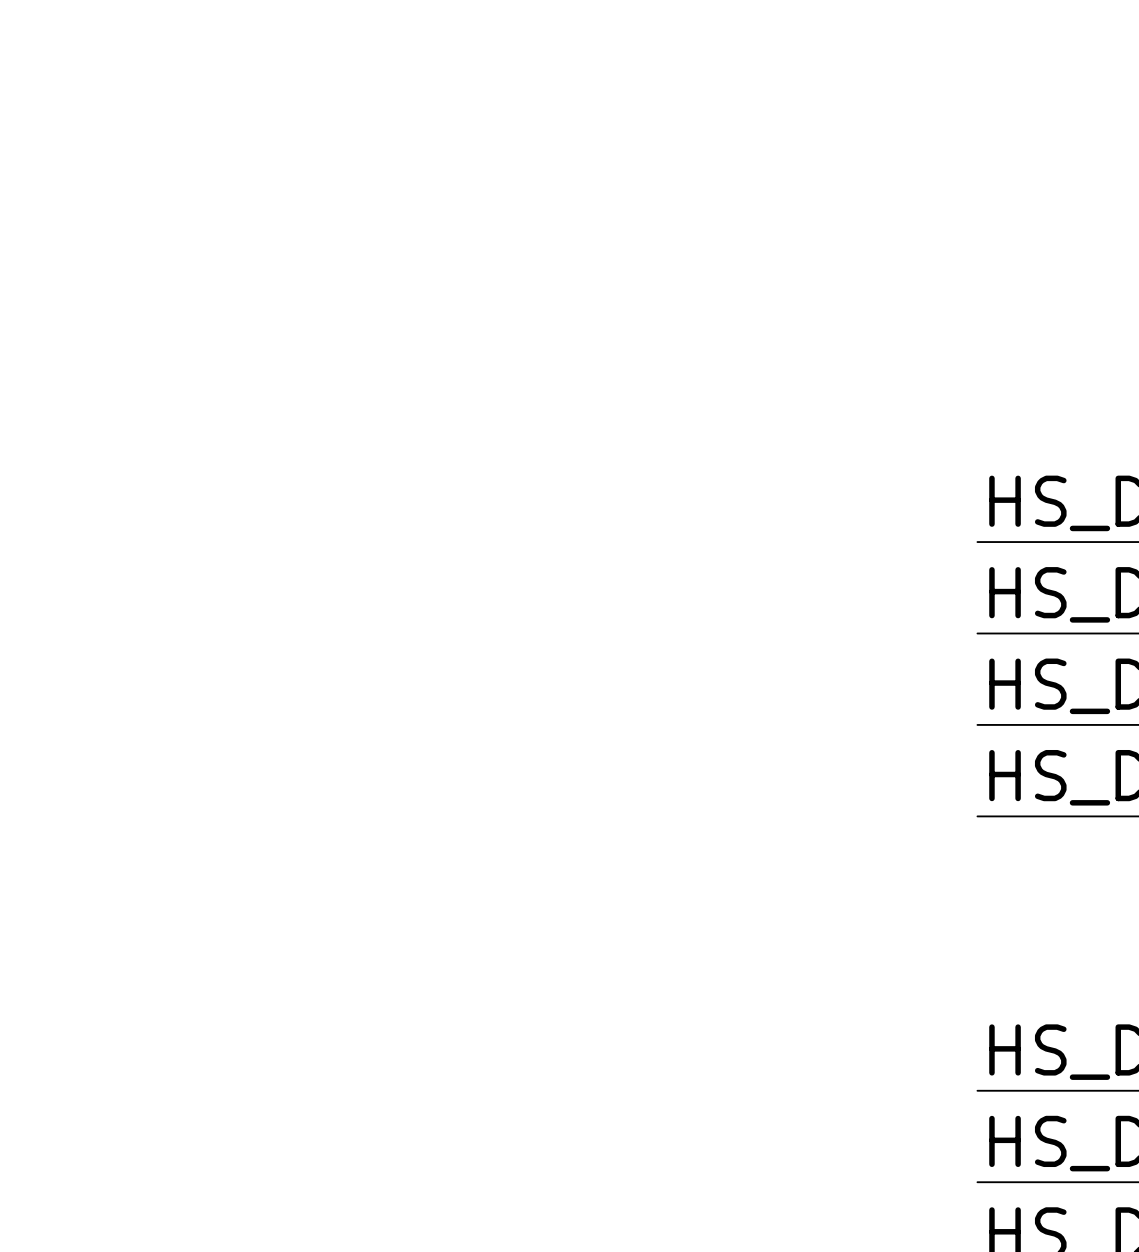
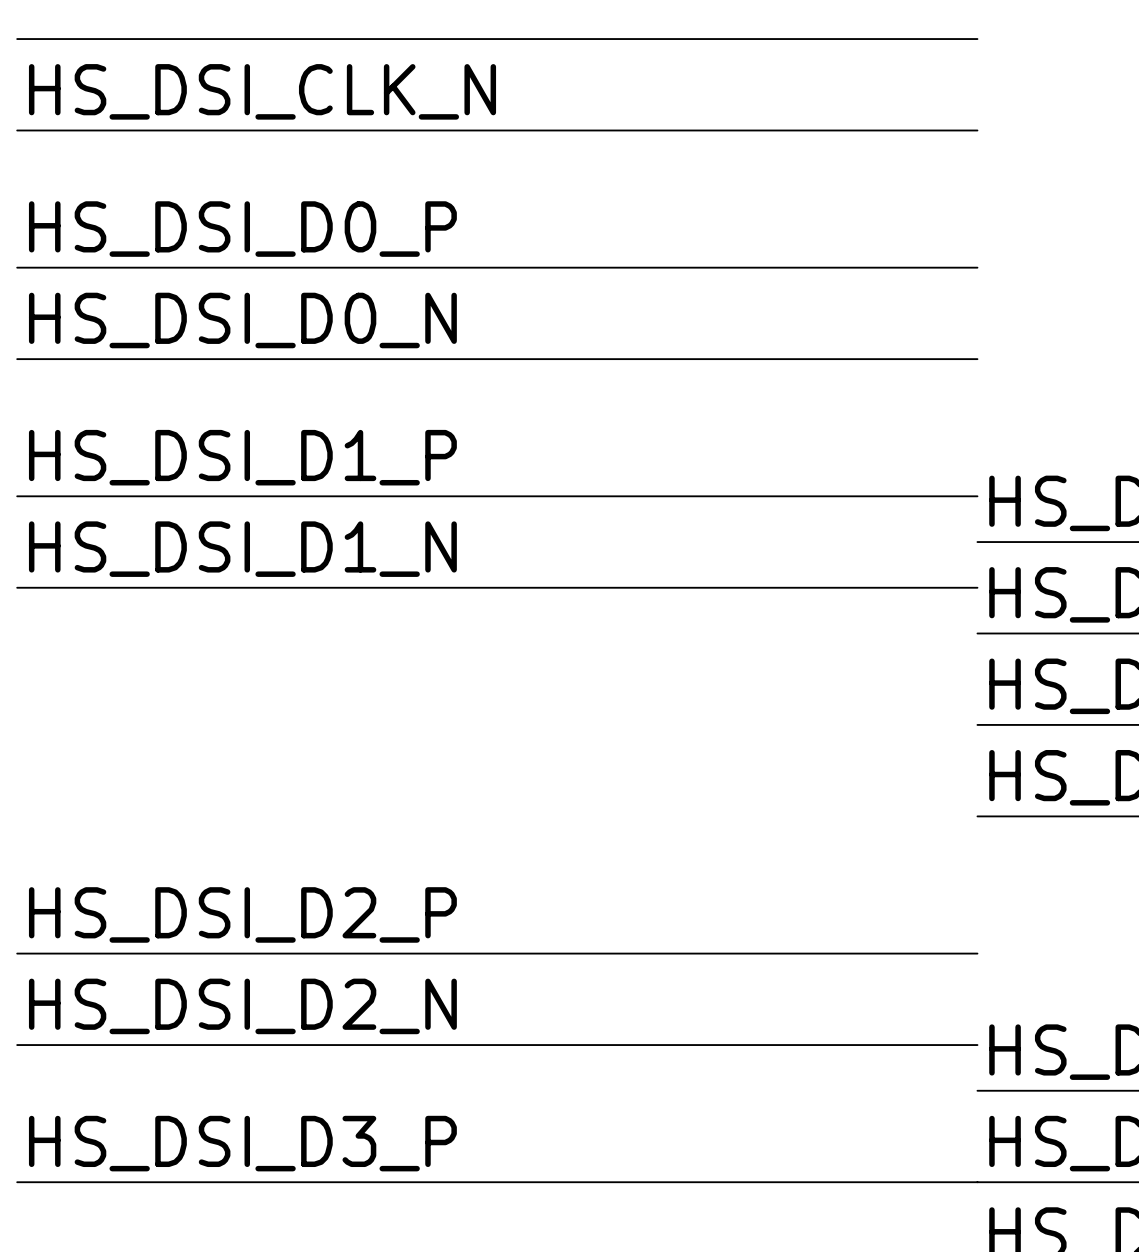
wire: none -> (17, 39) (977, 39)
label: none -> HS_DSI_CLK_N (262, 91)
wire: none -> (17, 130) (977, 130)
label: none -> HS_DSI_D0_P (242, 229)
wire: none -> (17, 267) (977, 267)
label: none -> HS_DSI_D0_N (242, 320)
wire: none -> (17, 359) (977, 359)
label: none -> HS_DSI_D1_P (242, 457)
wire: none -> (17, 496) (977, 496)
label: none -> HS_DSI_D1_N (242, 549)
wire: none -> (17, 587) (977, 587)
label: none -> HS_DSI_D2_P (242, 914)
wire: none -> (17, 953) (977, 953)
label: none -> HS_DSI_D2_N (242, 1006)
wire: none -> (17, 1045) (977, 1045)
label: none -> HS_DSI_D3_P (242, 1143)
wire: none -> (17, 1182) (977, 1182)

